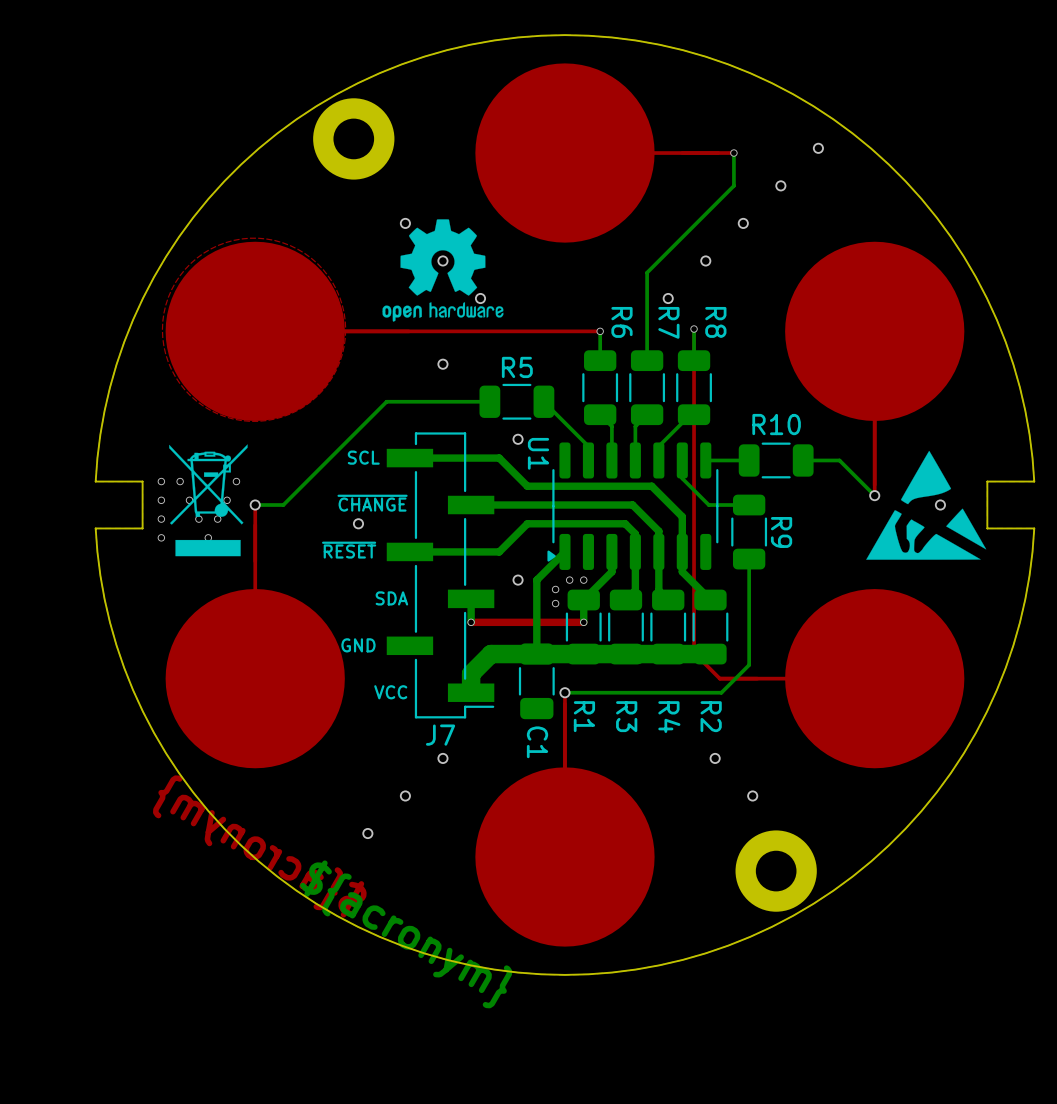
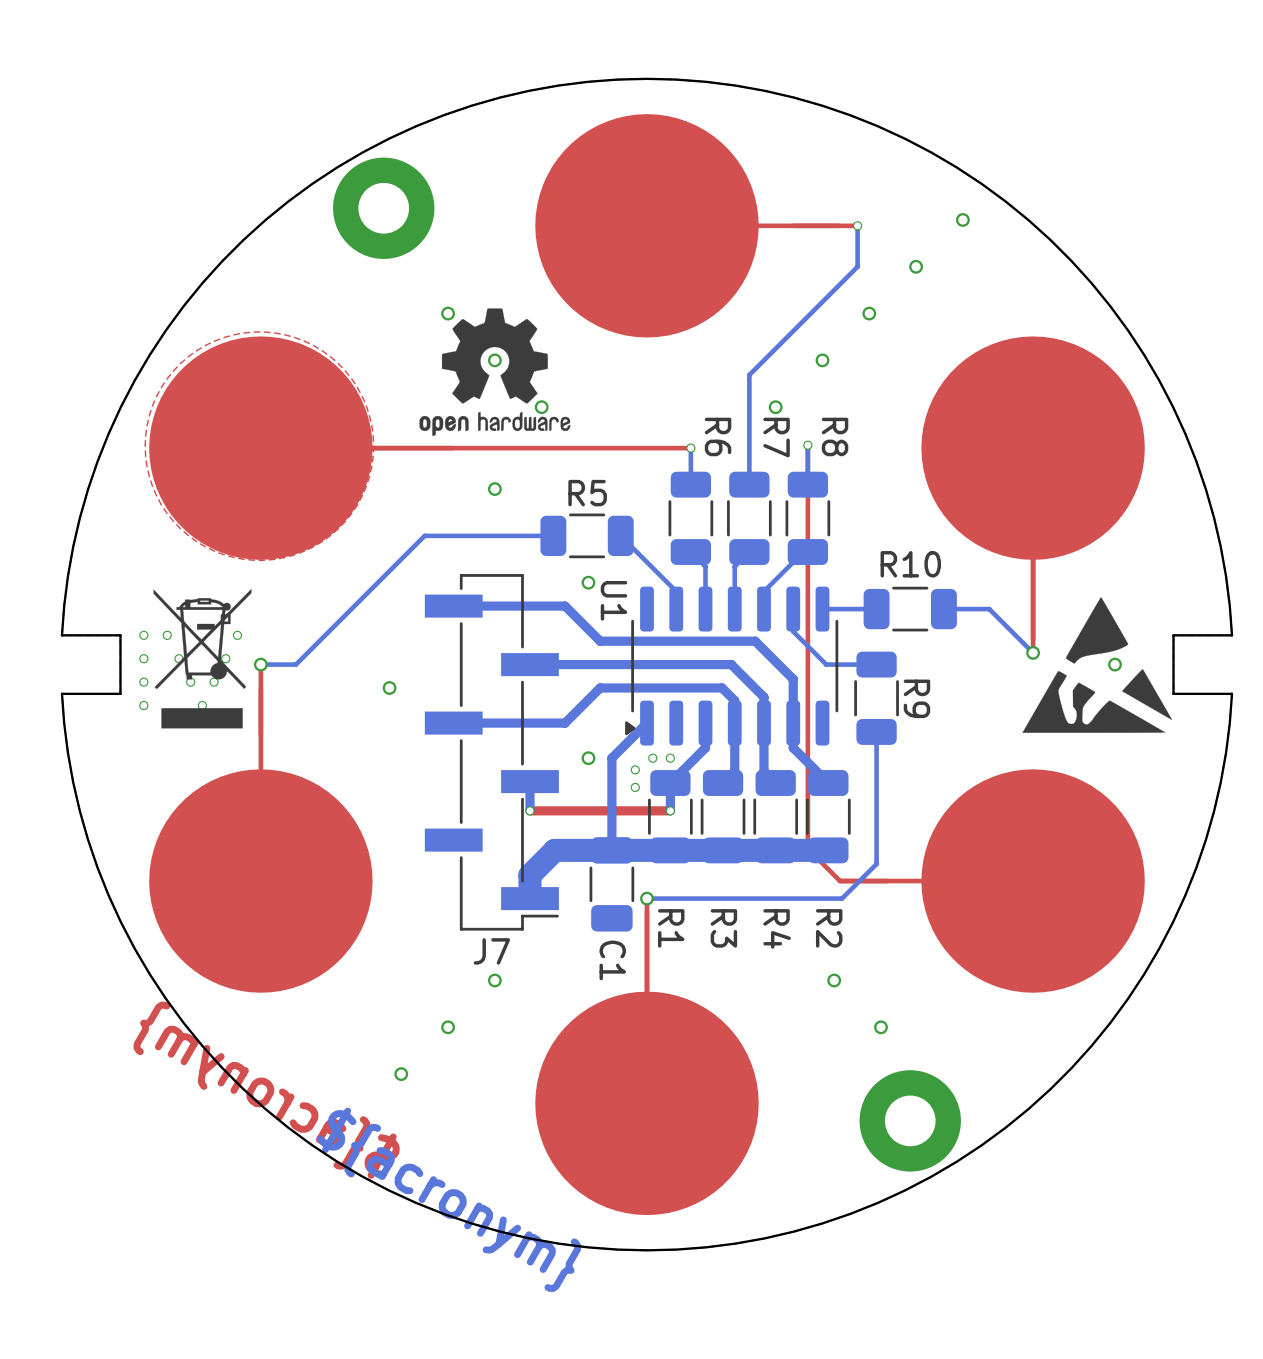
text: SCL (363, 457) -> none
text: ~{CHANGE} (372, 503) -> none
text: ~{RESET} (349, 550) -> none
text: SDA (391, 598) -> none
text: GND (358, 645) -> none
text: VCC (390, 692) -> none

